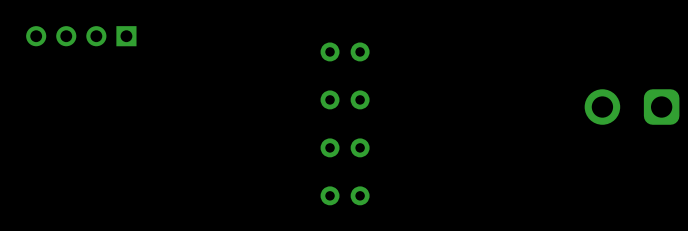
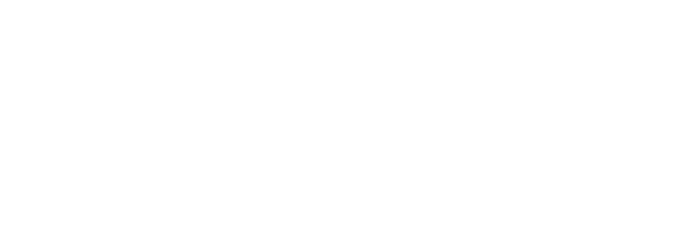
part: (81, 36) -> none
part: (345, 51) -> none
part: (345, 99) -> none
part: (632, 107) -> none
part: (345, 147) -> none
part: (345, 195) -> none

